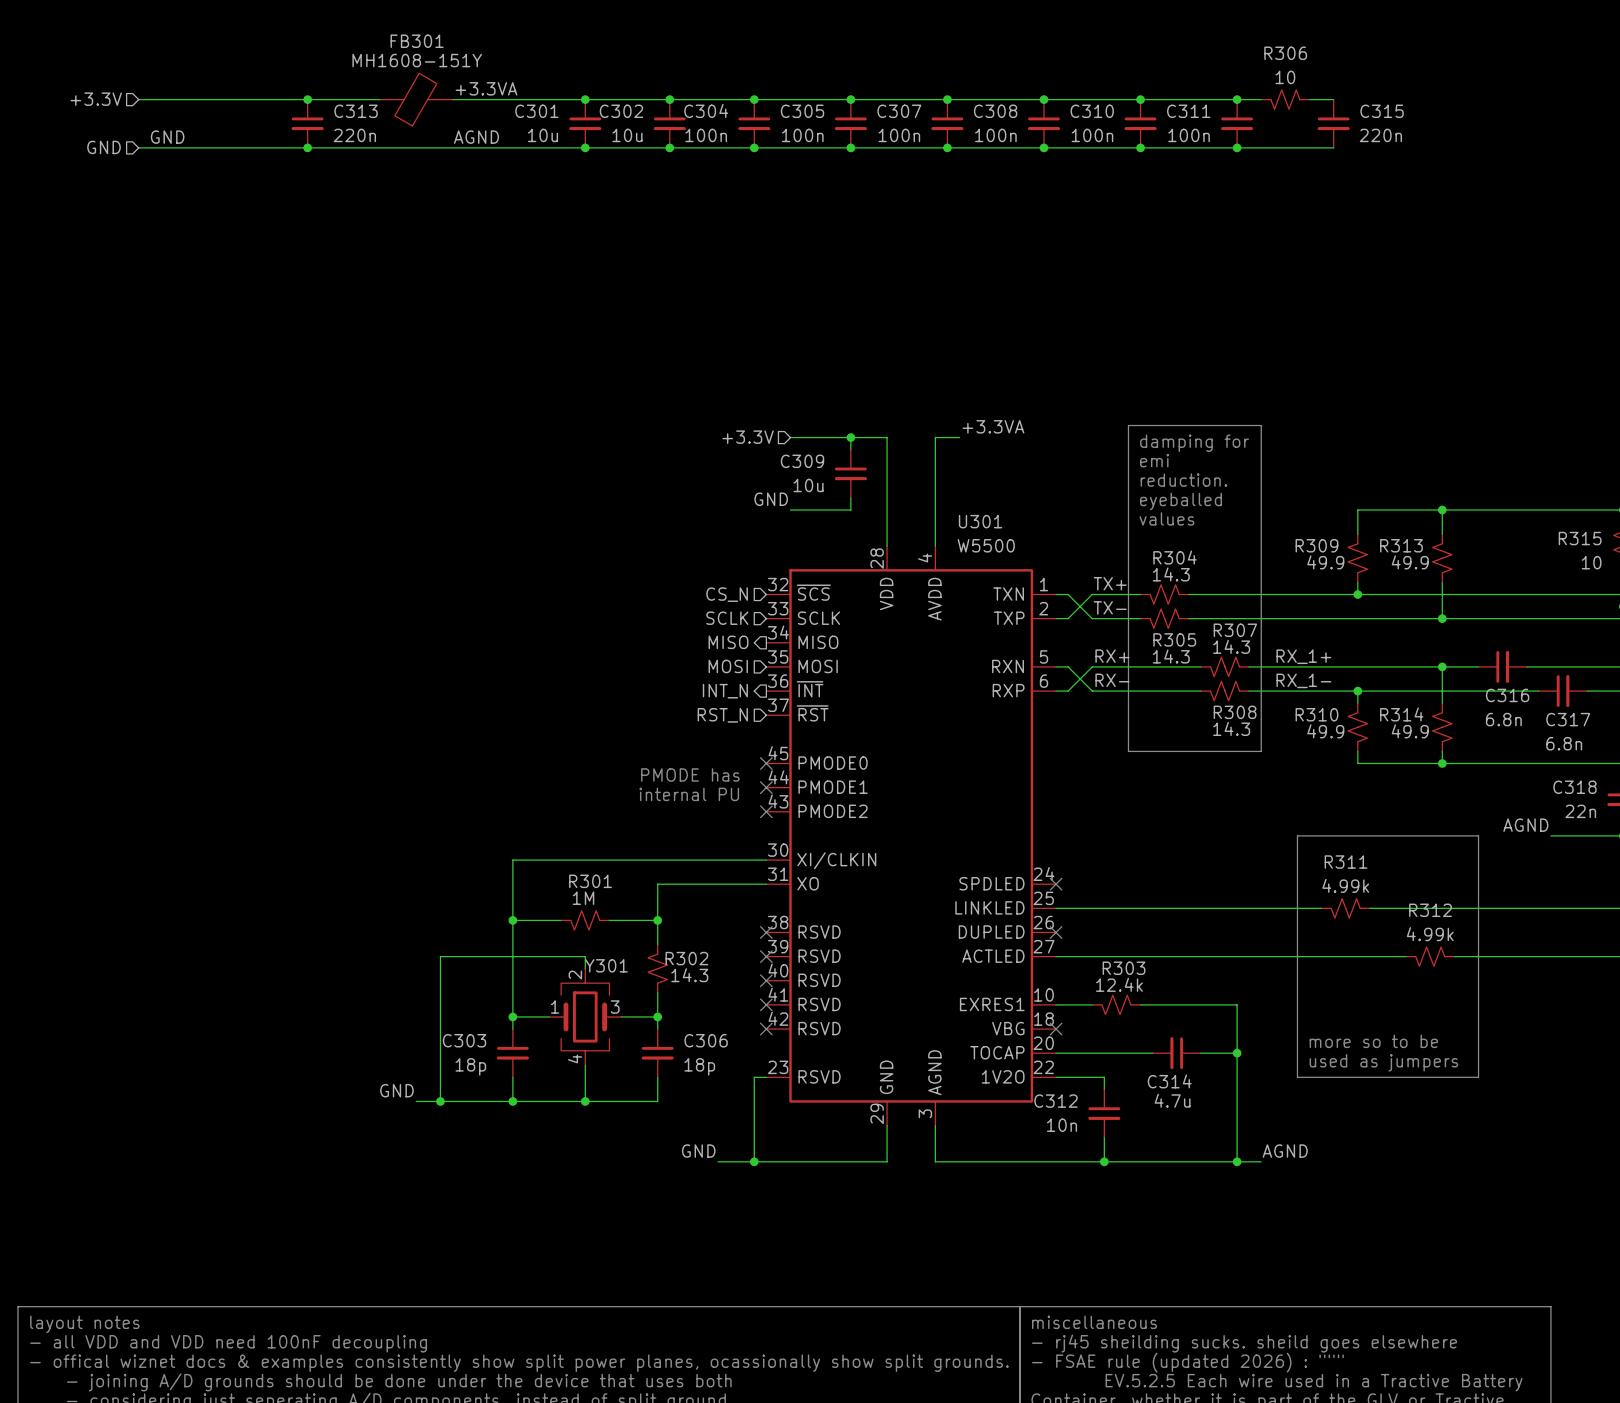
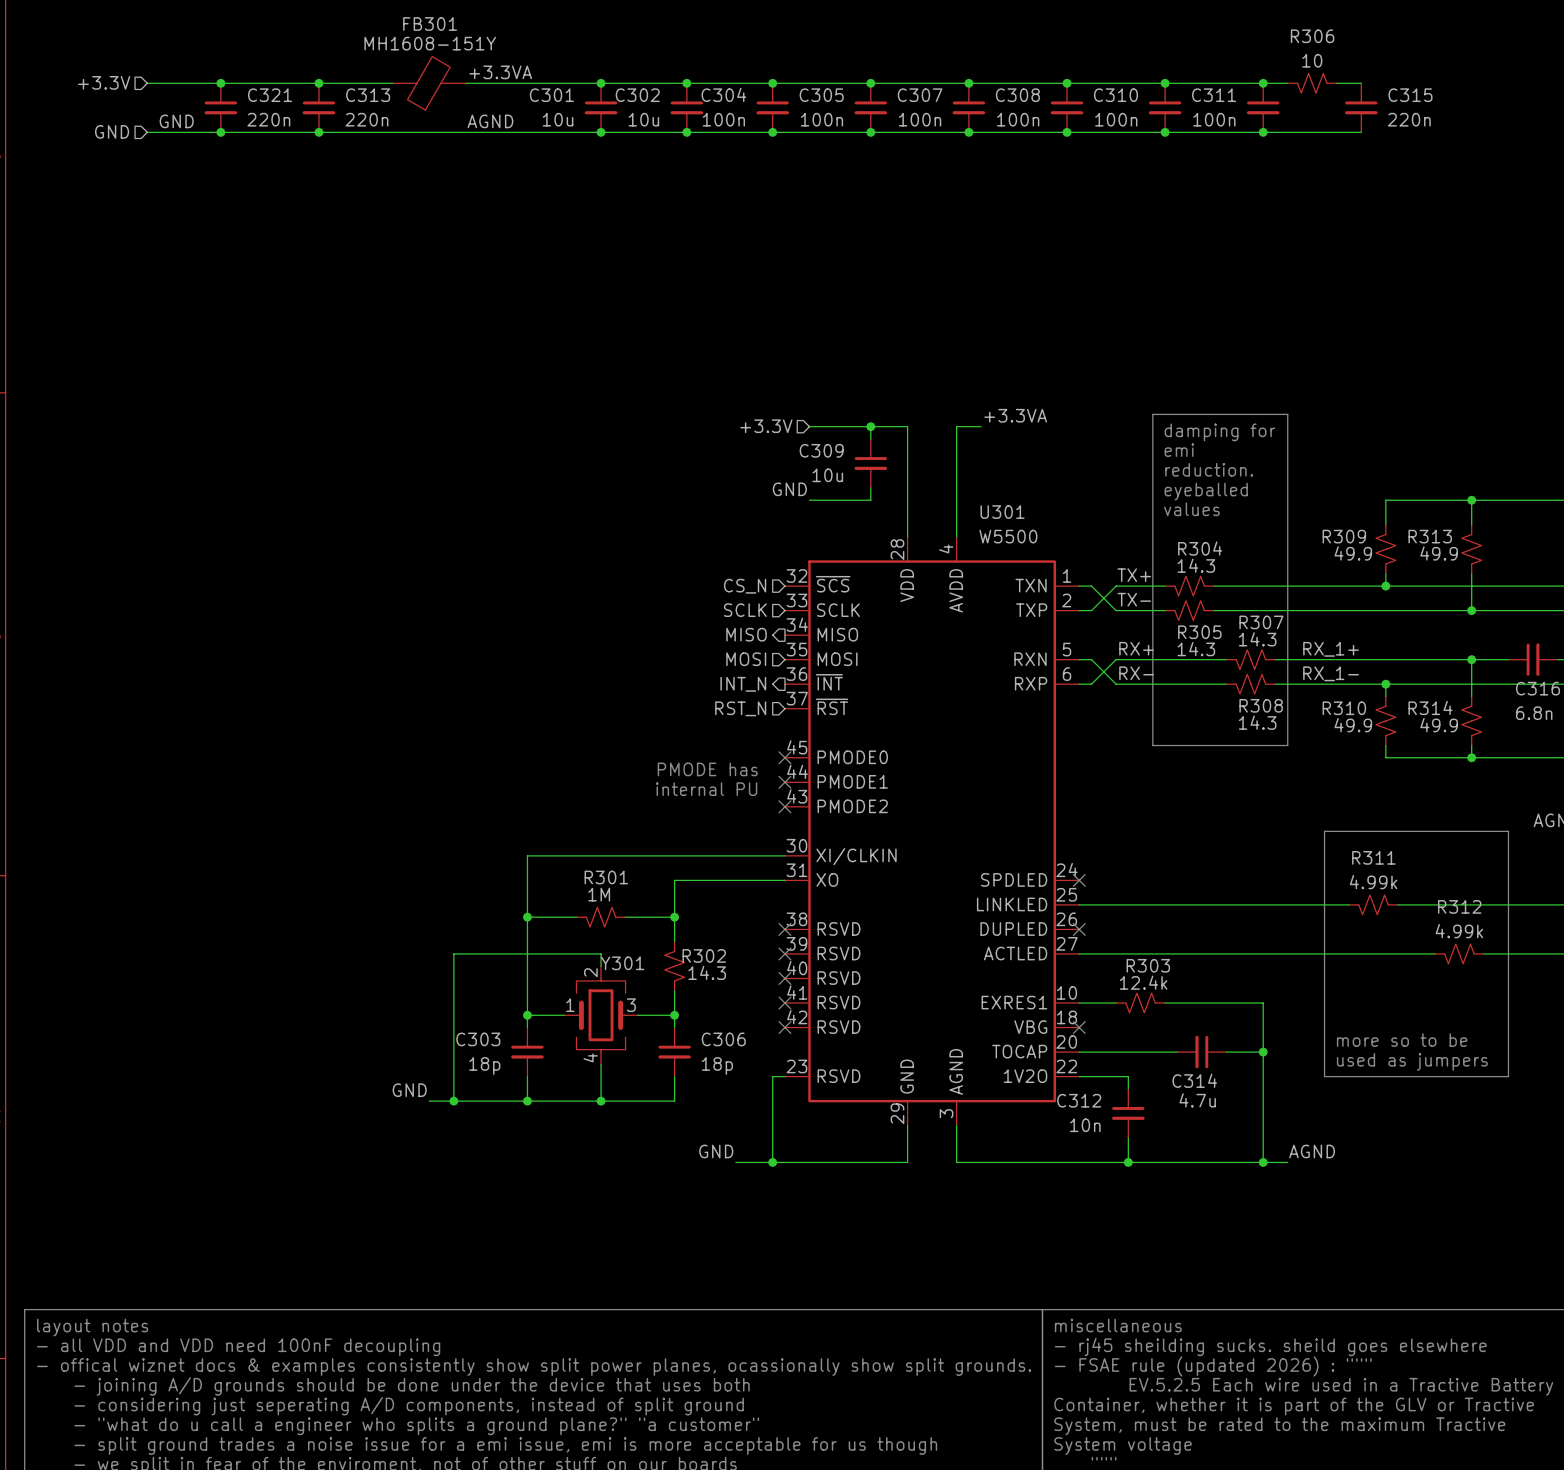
junction: none -> (220, 83)
C321: none -> 220n (220, 107)
junction: none -> (220, 132)

